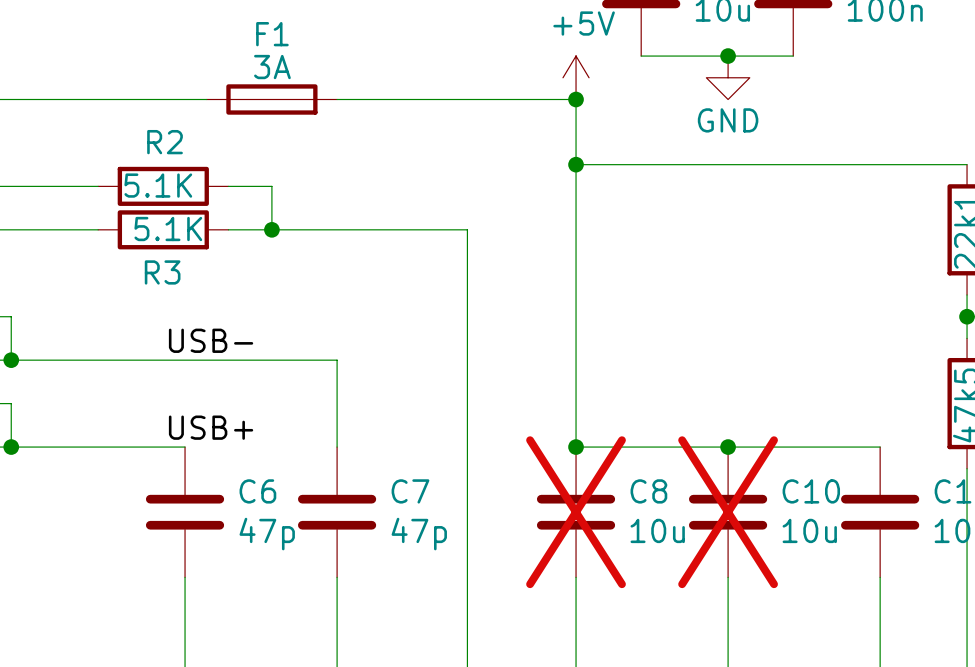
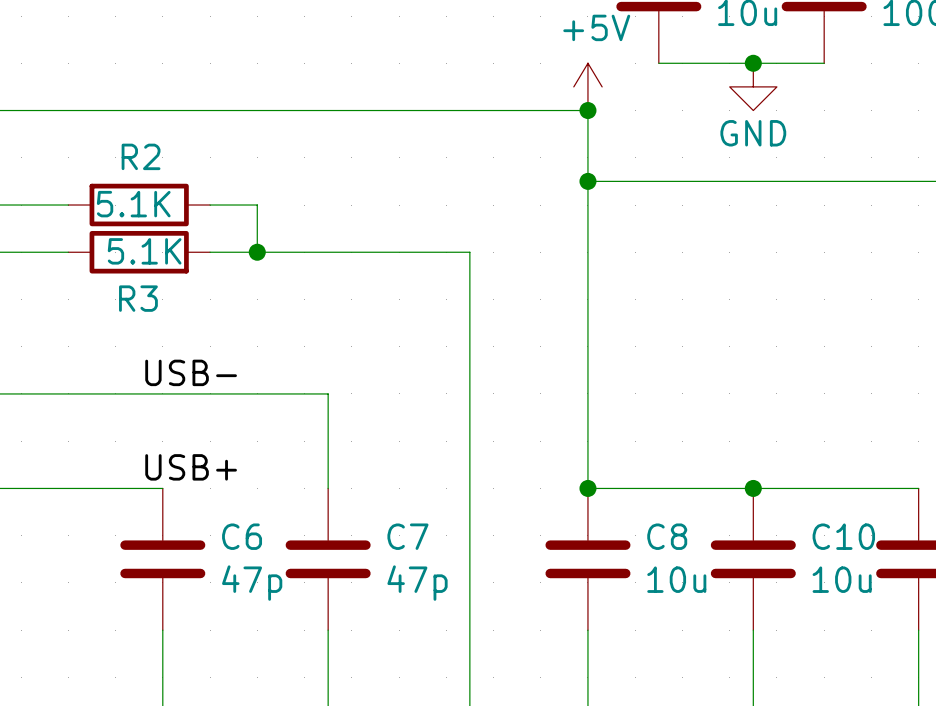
F1: 3A (271, 99) -> none
C8 do-not-place cross: (576, 512) -> none
C10 do-not-place cross: (728, 512) -> none

